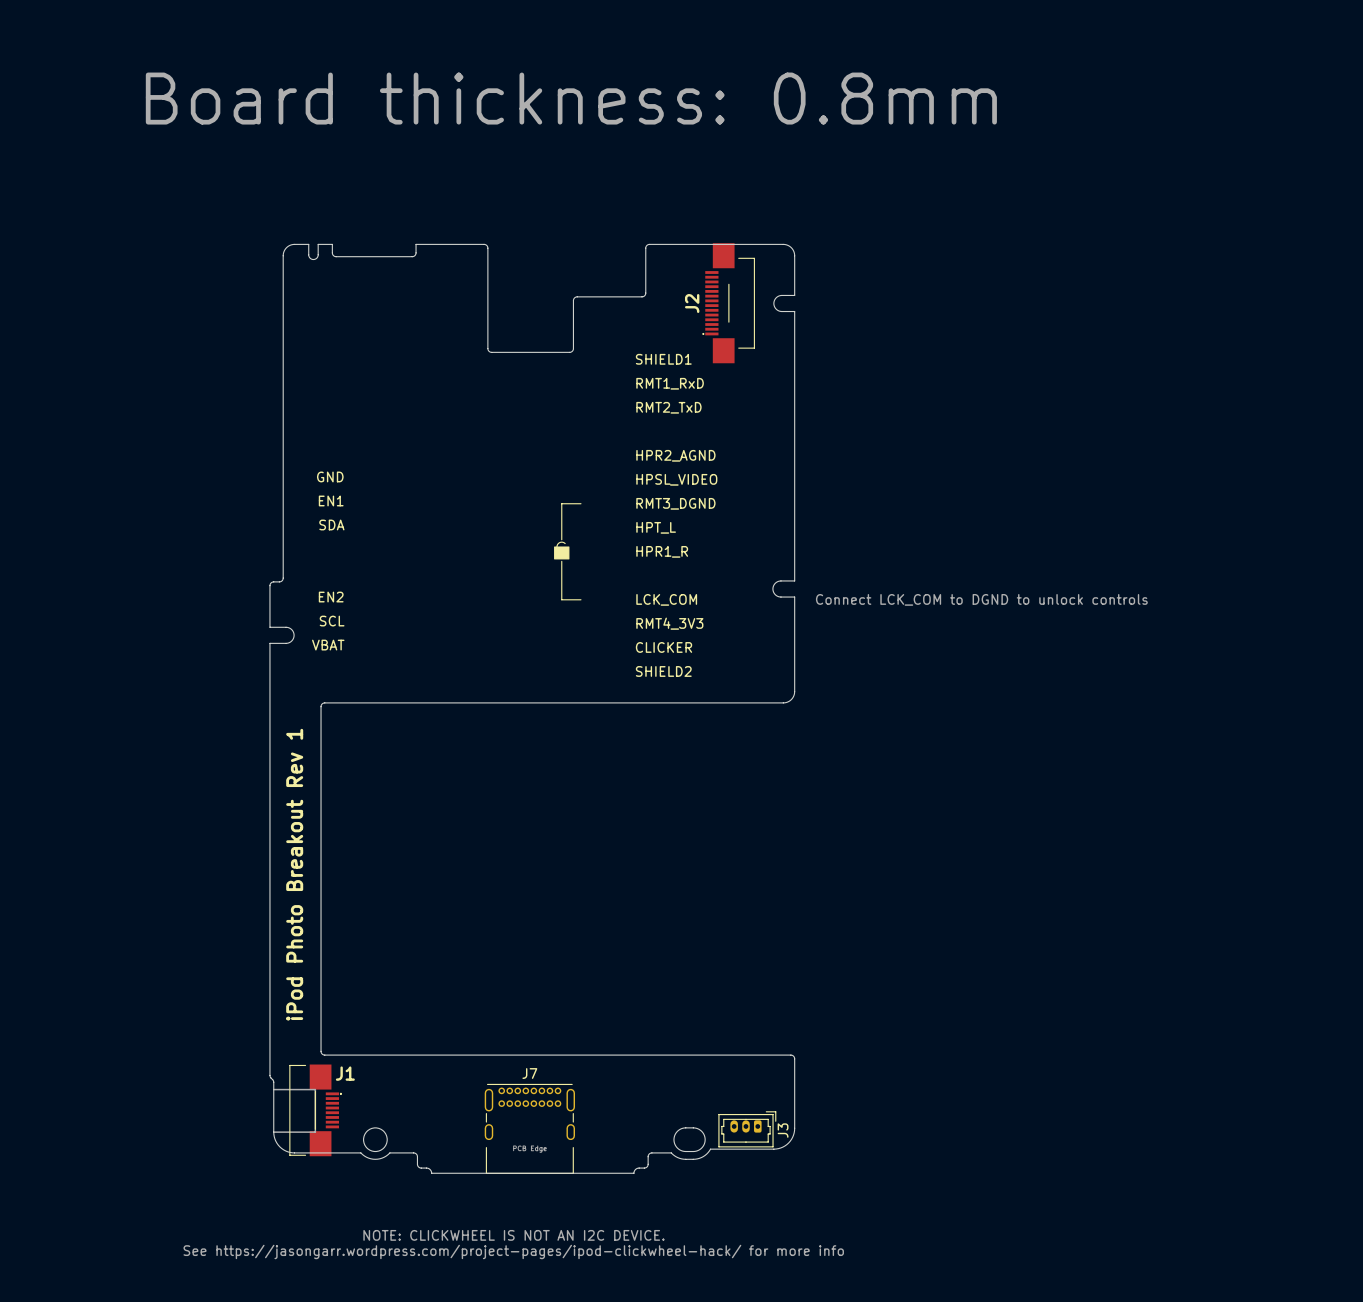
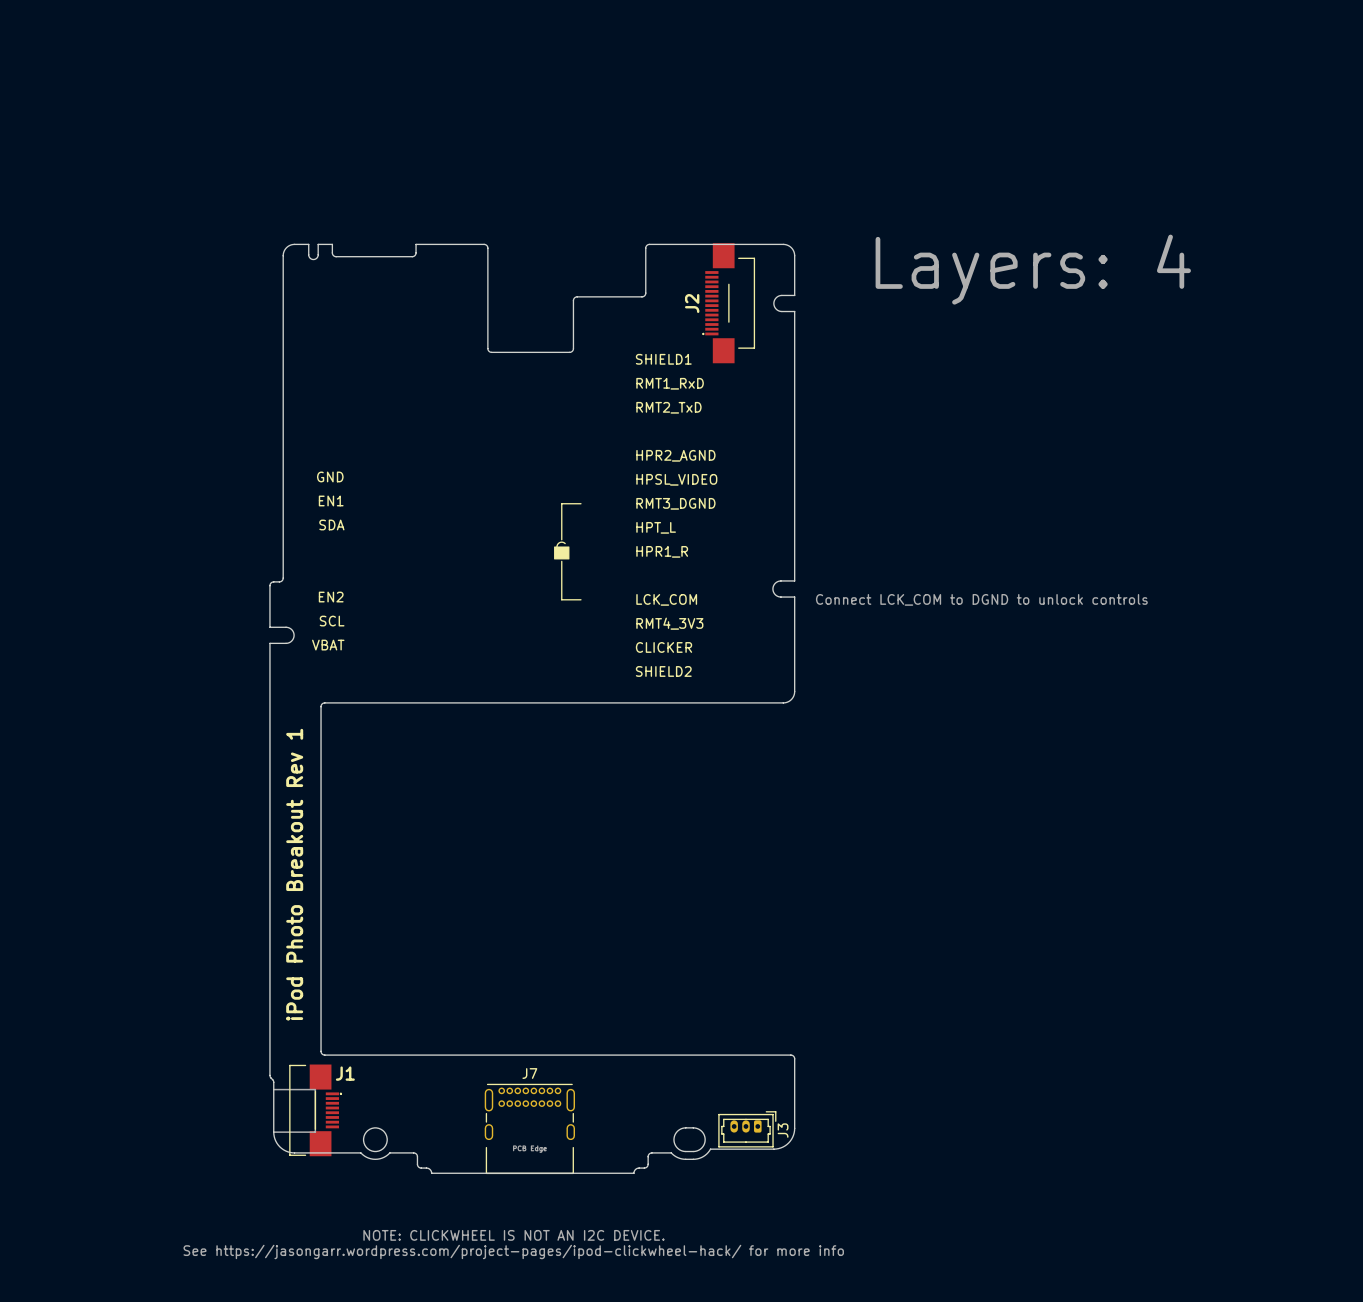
text: Board thickness: 0.8mm (571, 98) -> none
text: none -> Layers: 4 (1033, 269)

